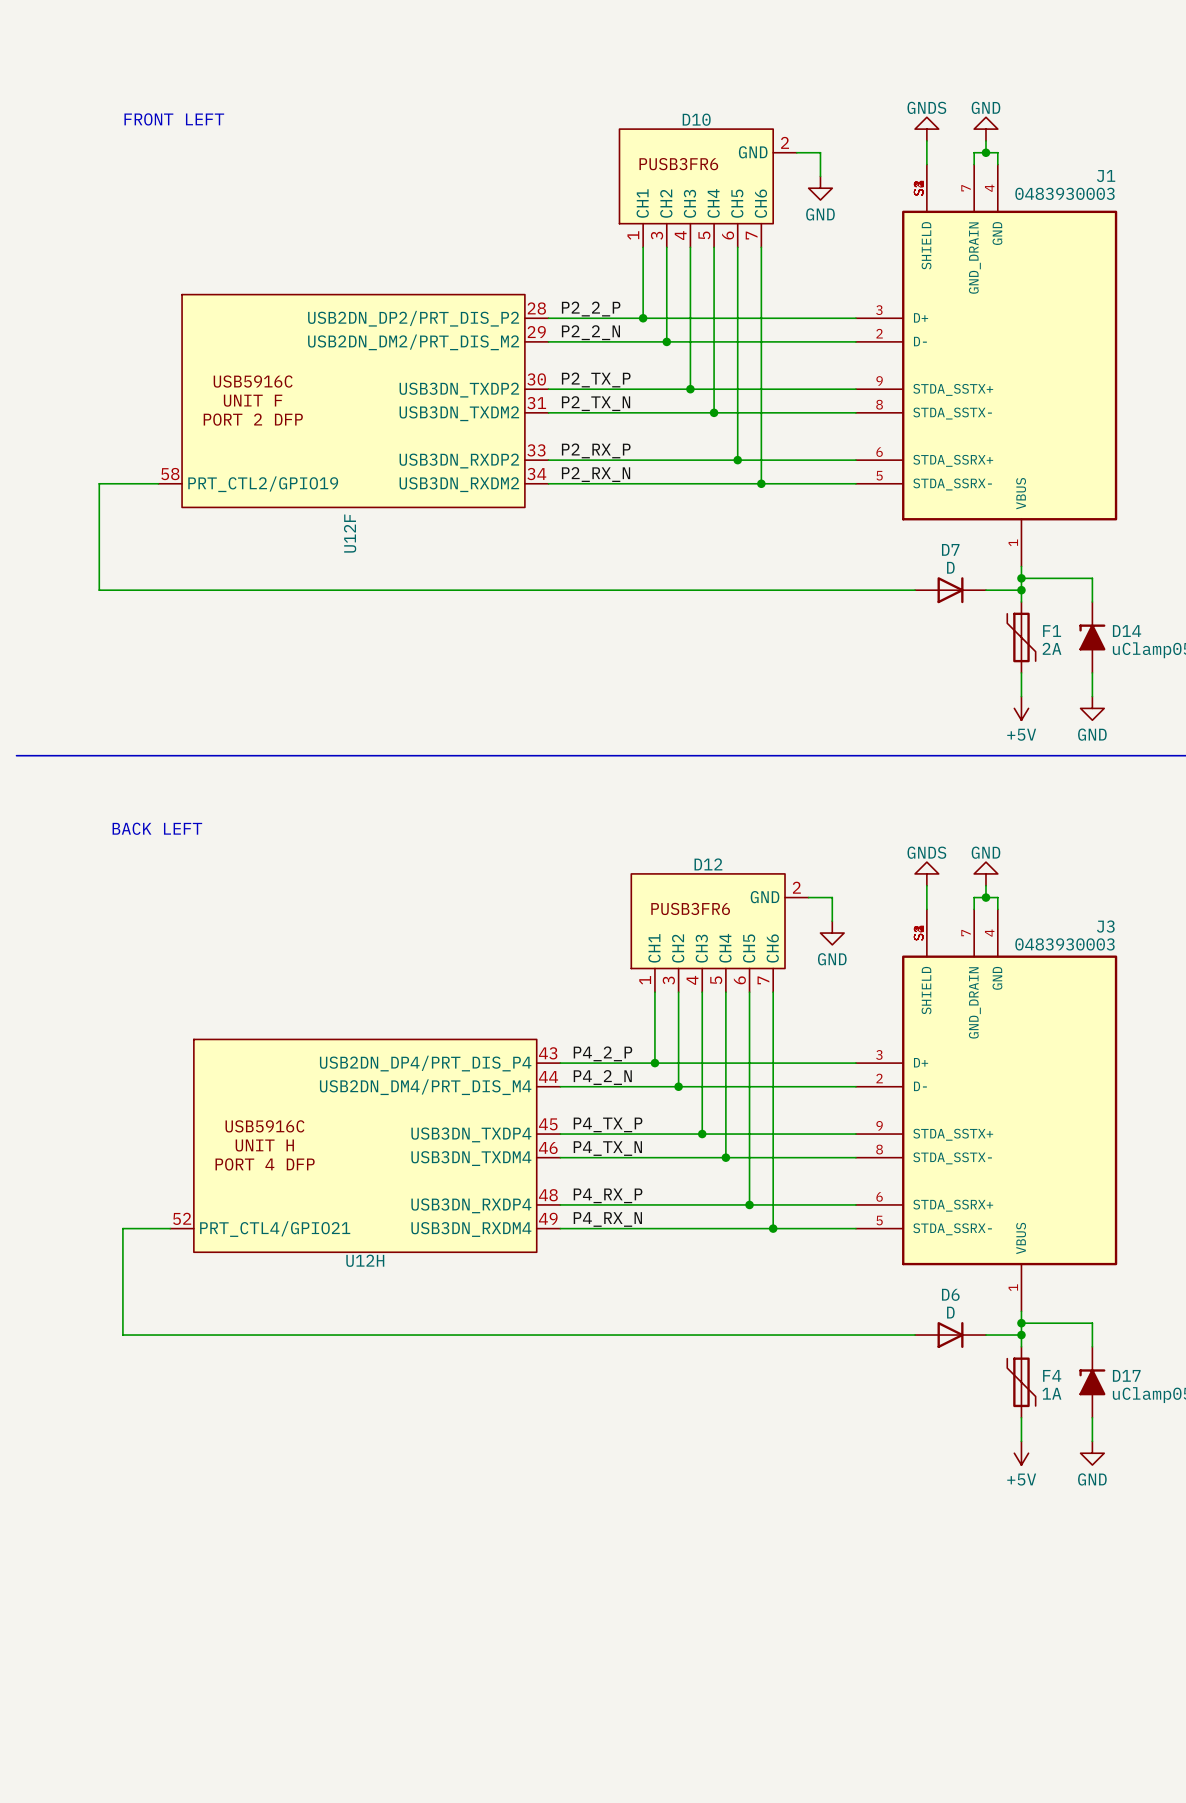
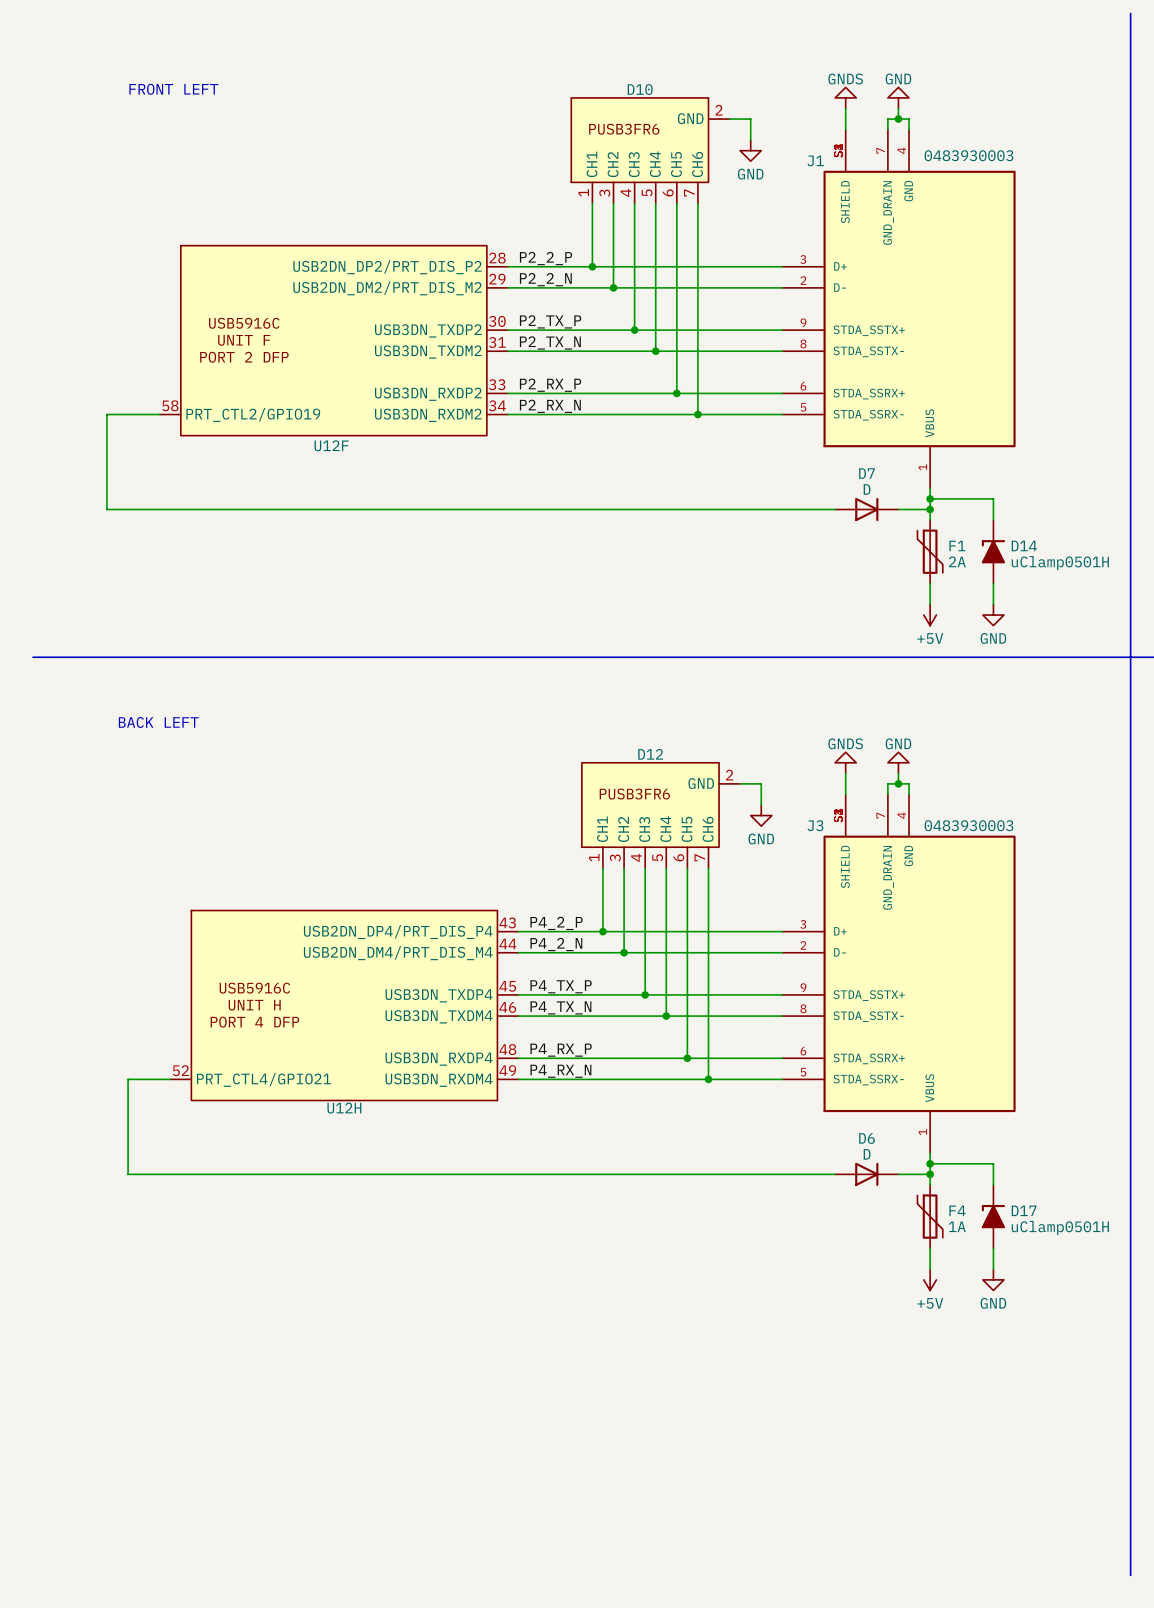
J1 name position: J1 (1106, 176) -> J1 (815, 160)
U12F name rotation: 0° (350, 533) -> 90° clockwise (331, 445)
J3 name position: J3 (1105, 926) -> J3 (815, 825)

